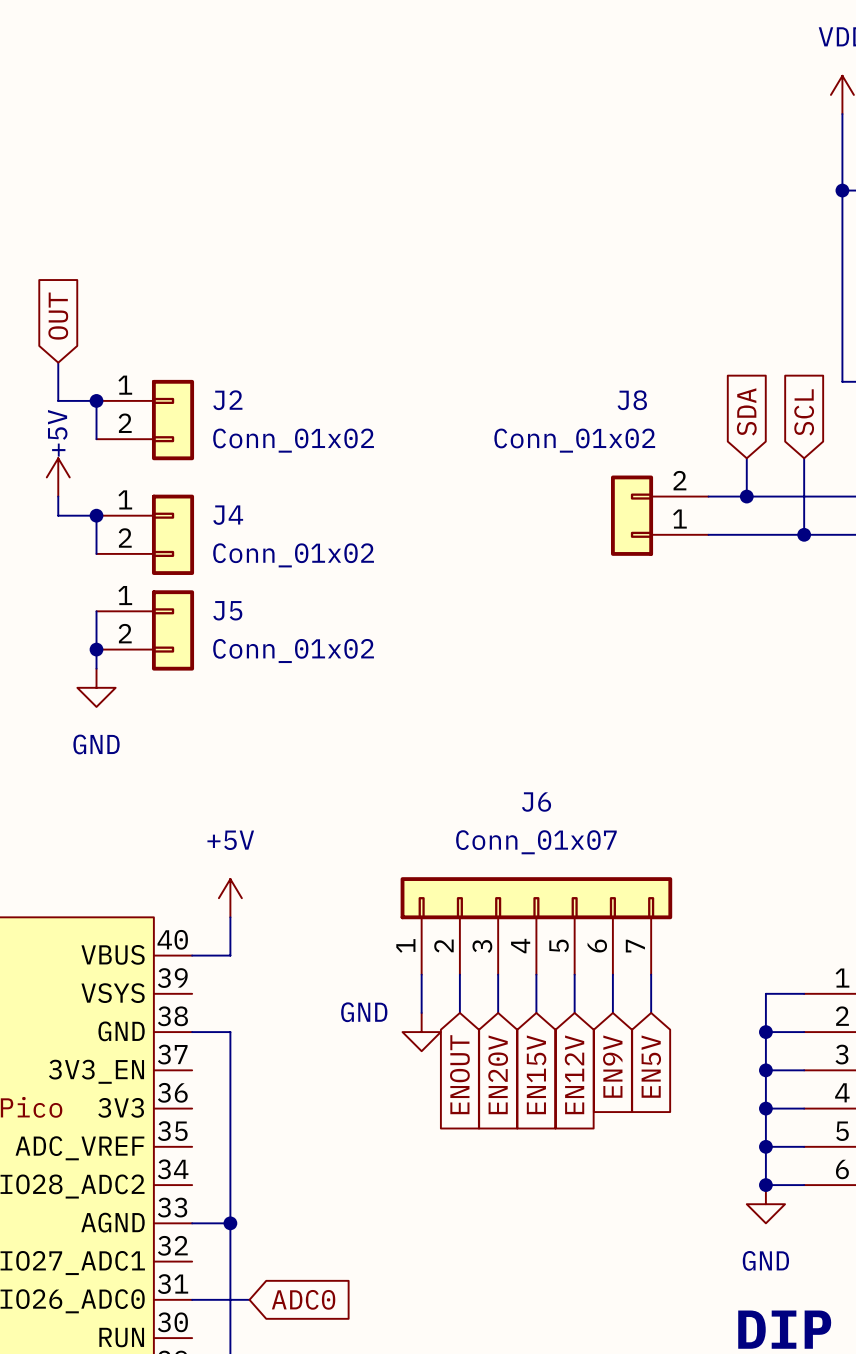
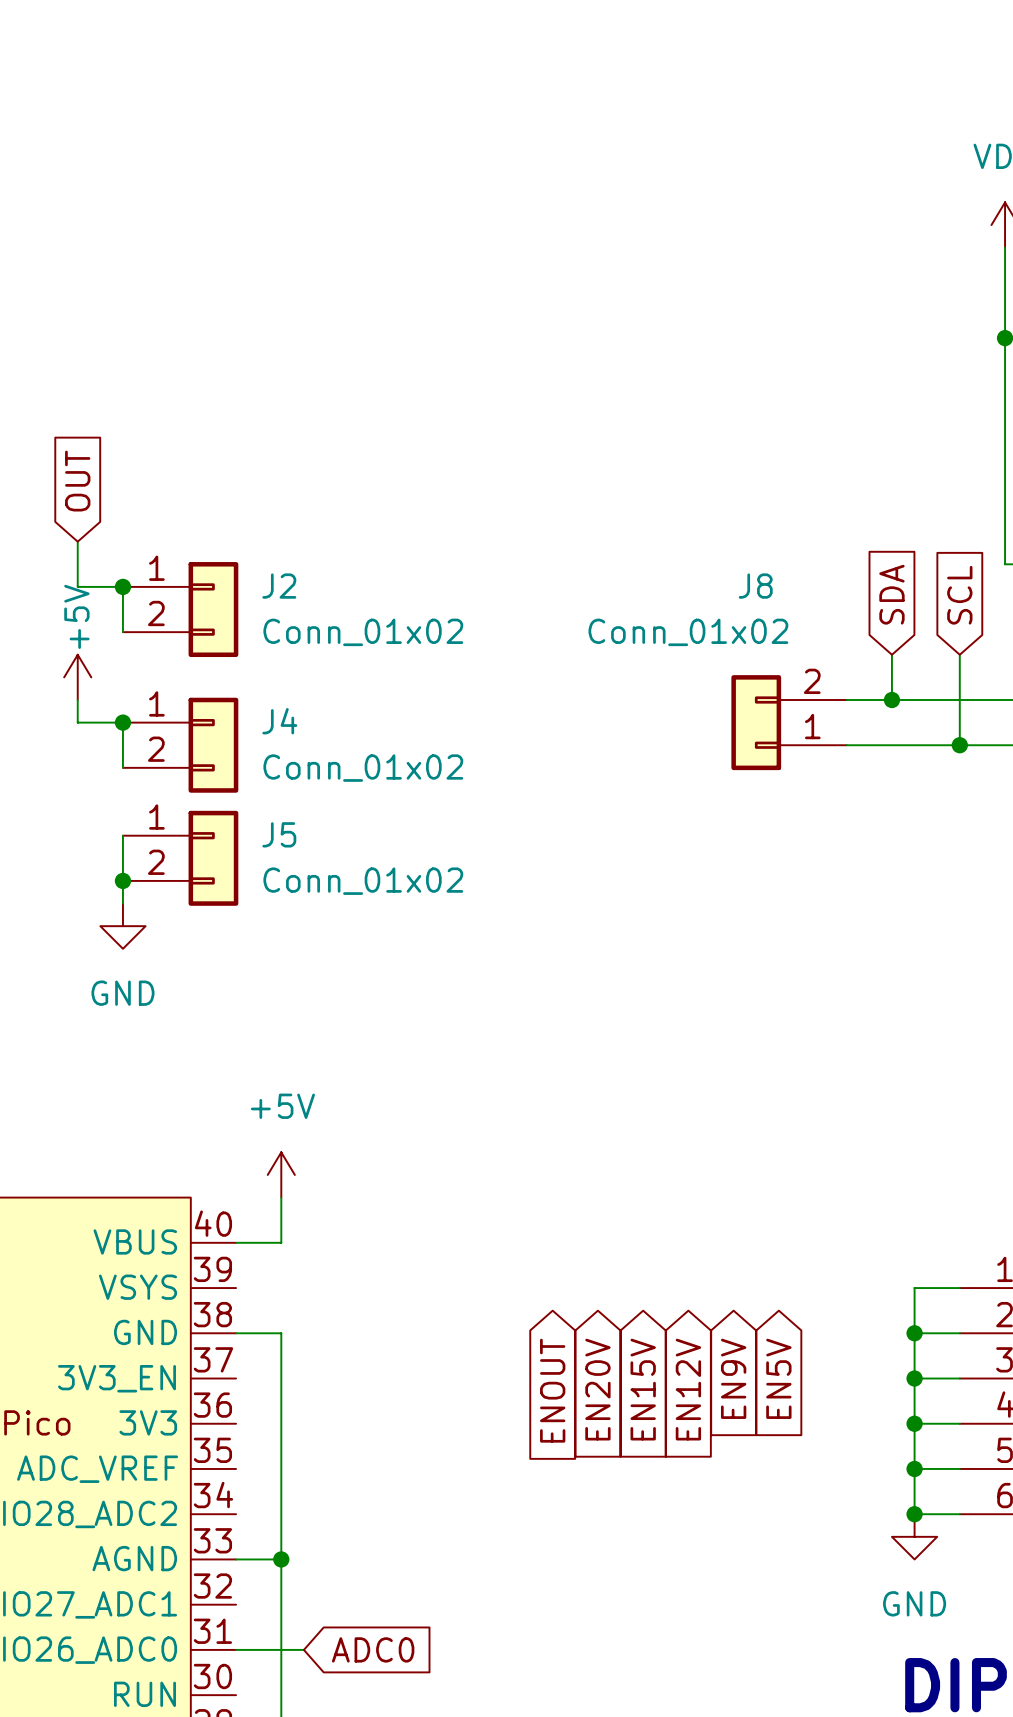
J6: Conn_01x07 (536, 925) -> none
wire: (421, 974) (421, 1012) -> none
wire: (459, 974) (459, 1012) -> none
wire: (498, 974) (498, 1012) -> none
wire: (536, 974) (536, 1012) -> none
wire: (574, 974) (574, 1012) -> none
wire: (612, 974) (612, 1012) -> none
wire: (651, 974) (651, 1012) -> none
power symbol: GND (421, 1032) -> none

